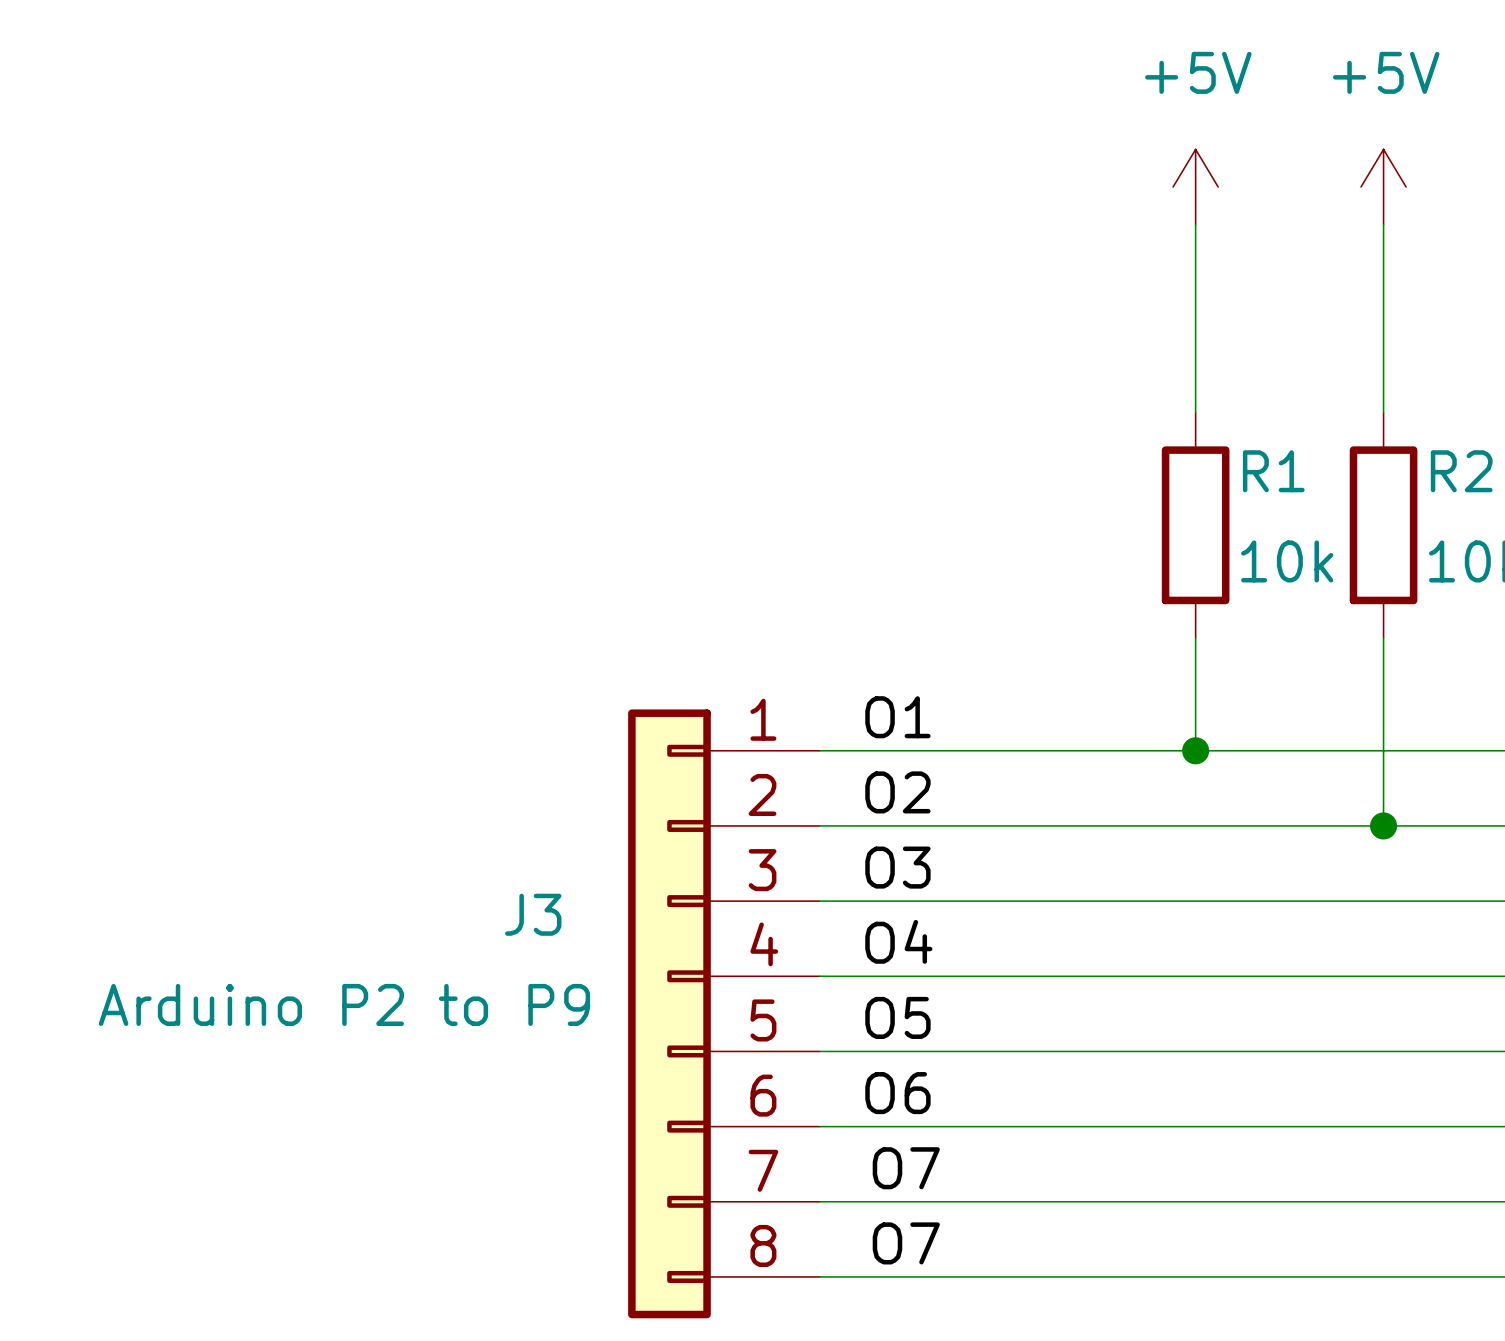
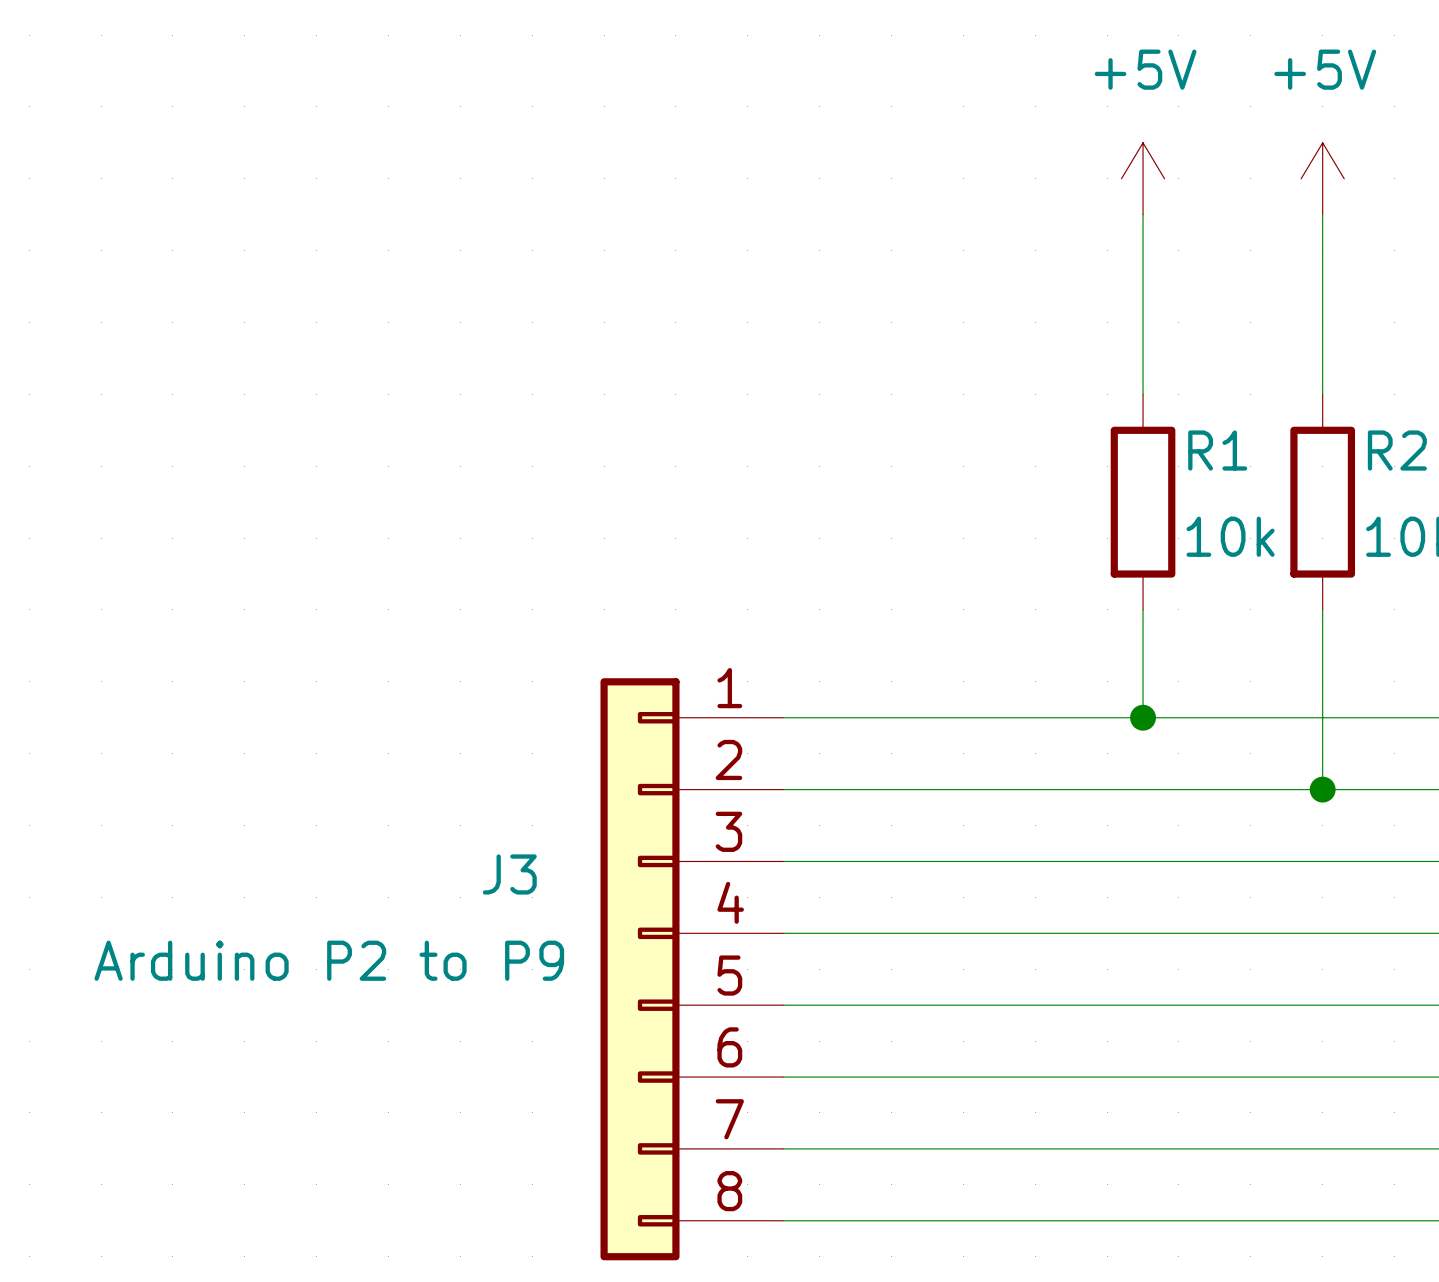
label: O1 (897, 717) -> none
label: O2 (897, 792) -> none
label: O3 (897, 867) -> none
label: O4 (898, 941) -> none
label: O5 (897, 1017) -> none
label: O6 (897, 1093) -> none
label: O7 (906, 1168) -> none
label: O7 (906, 1243) -> none

